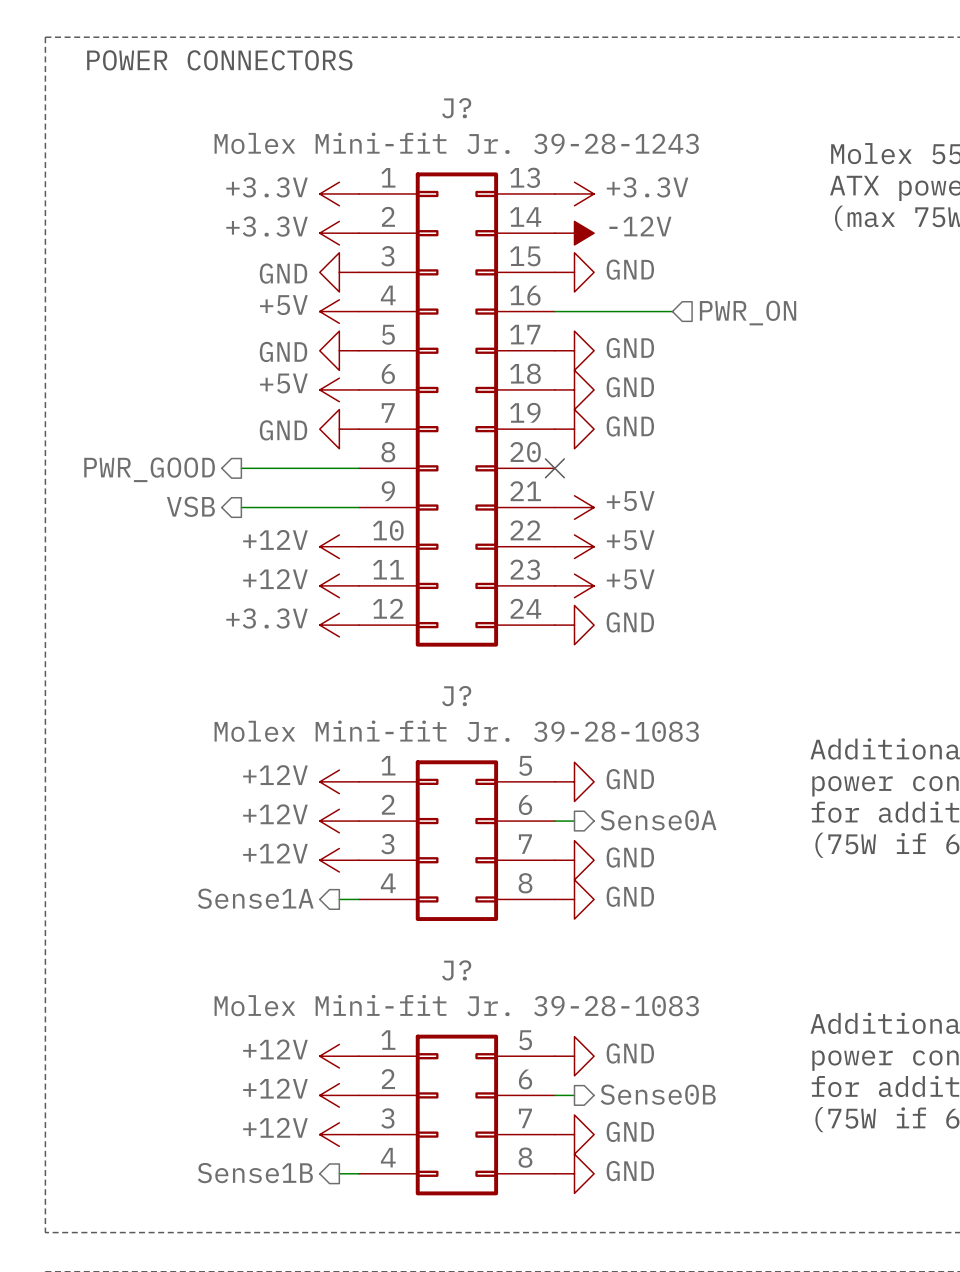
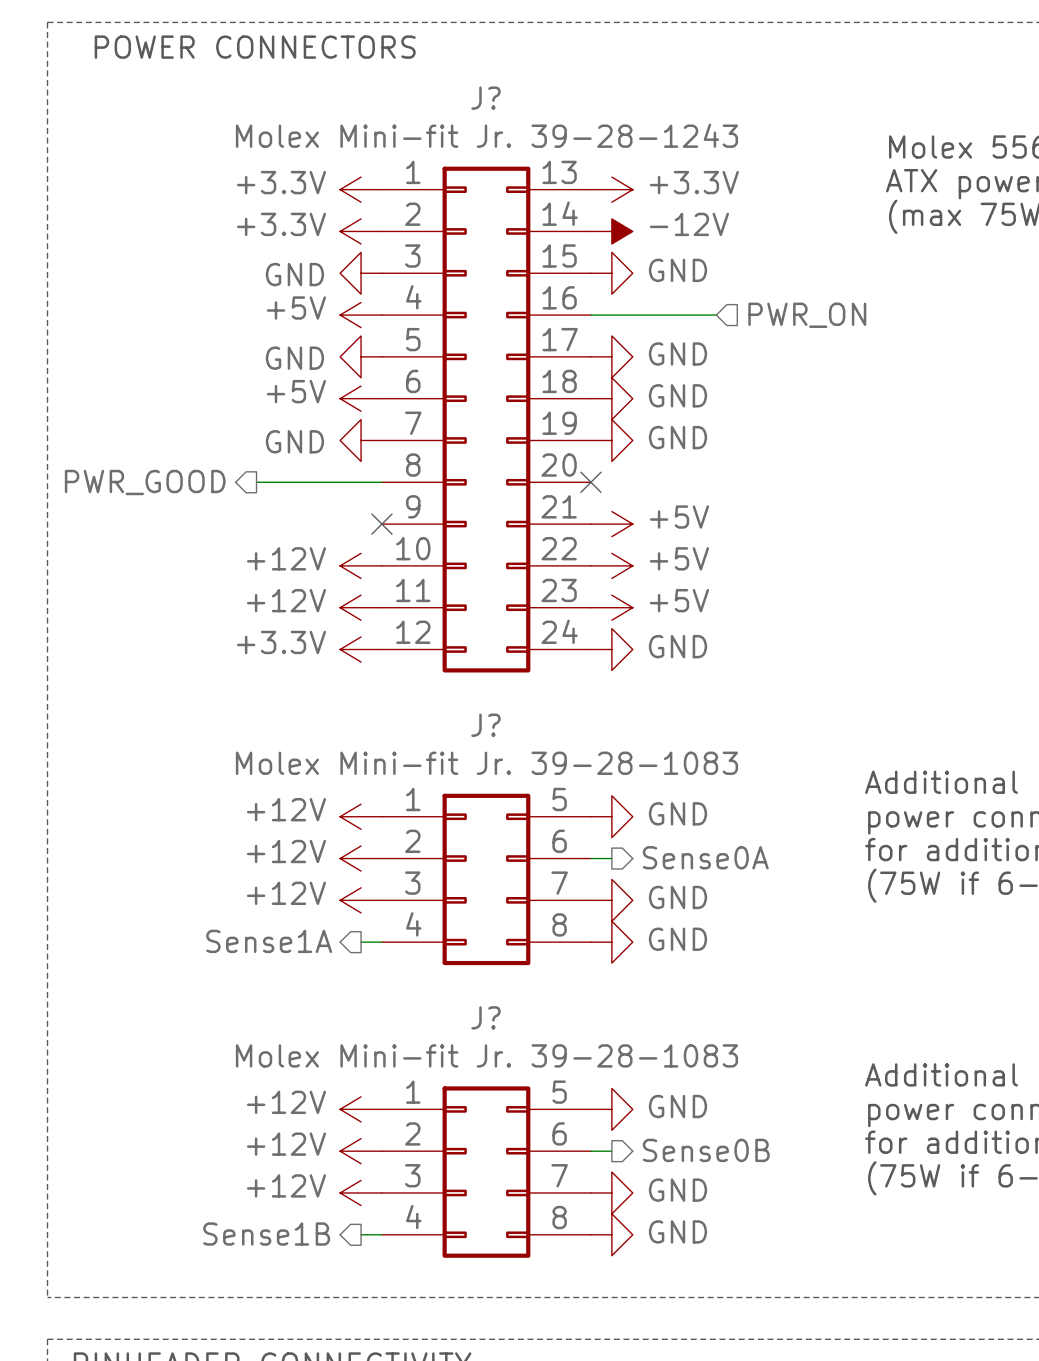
hierarchical label: VSB (190, 506) -> none
wire: (241, 507) (358, 507) -> none
no-connect mark: none -> (381, 524)

